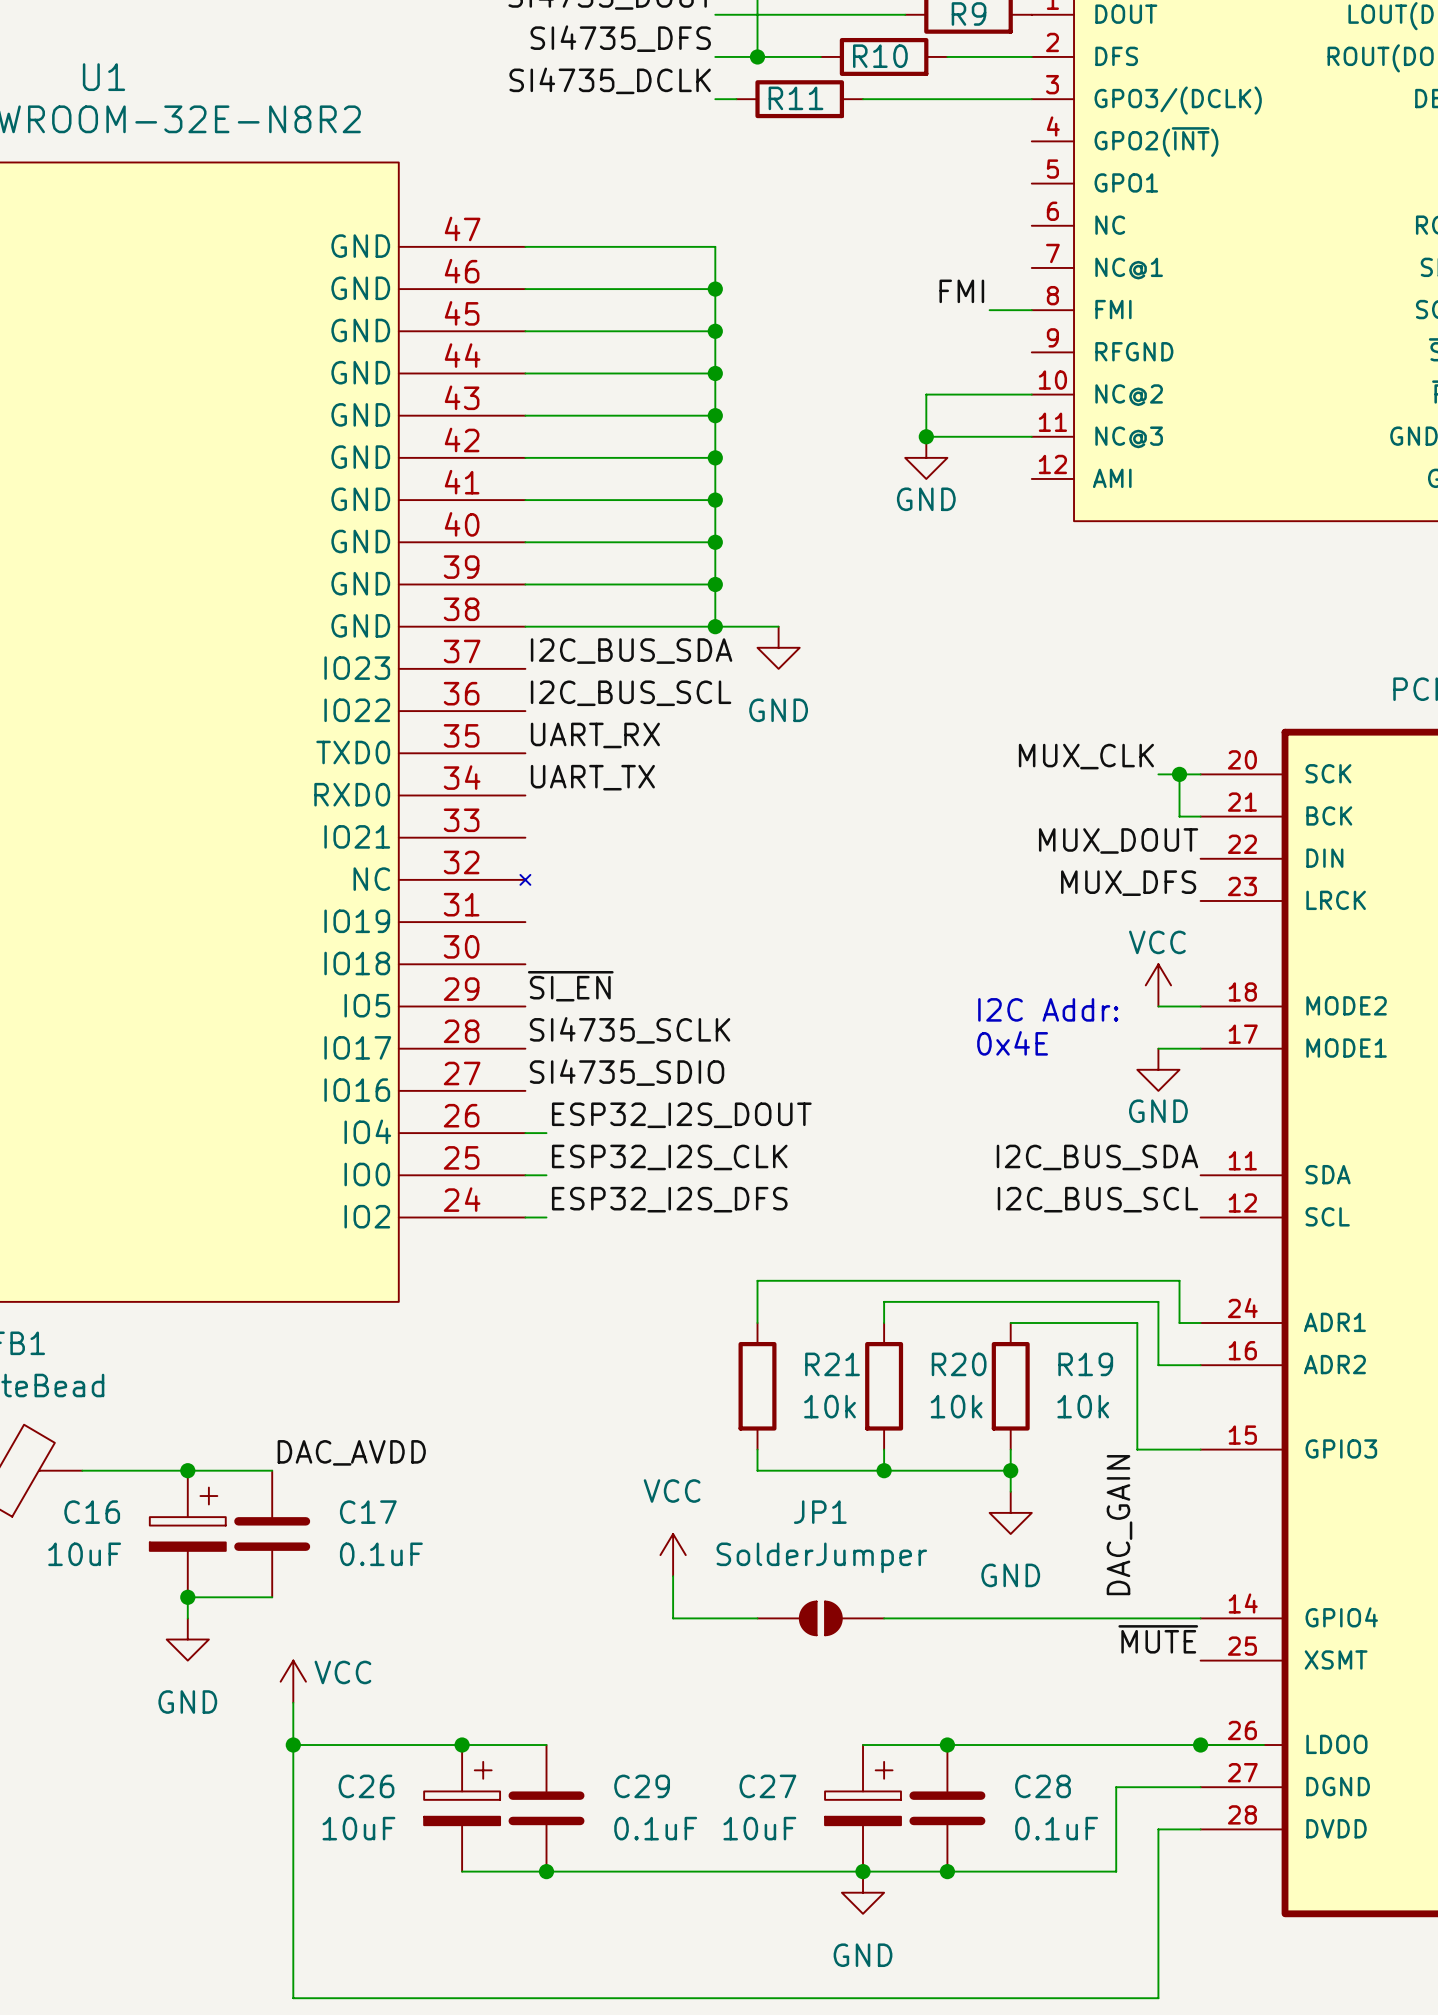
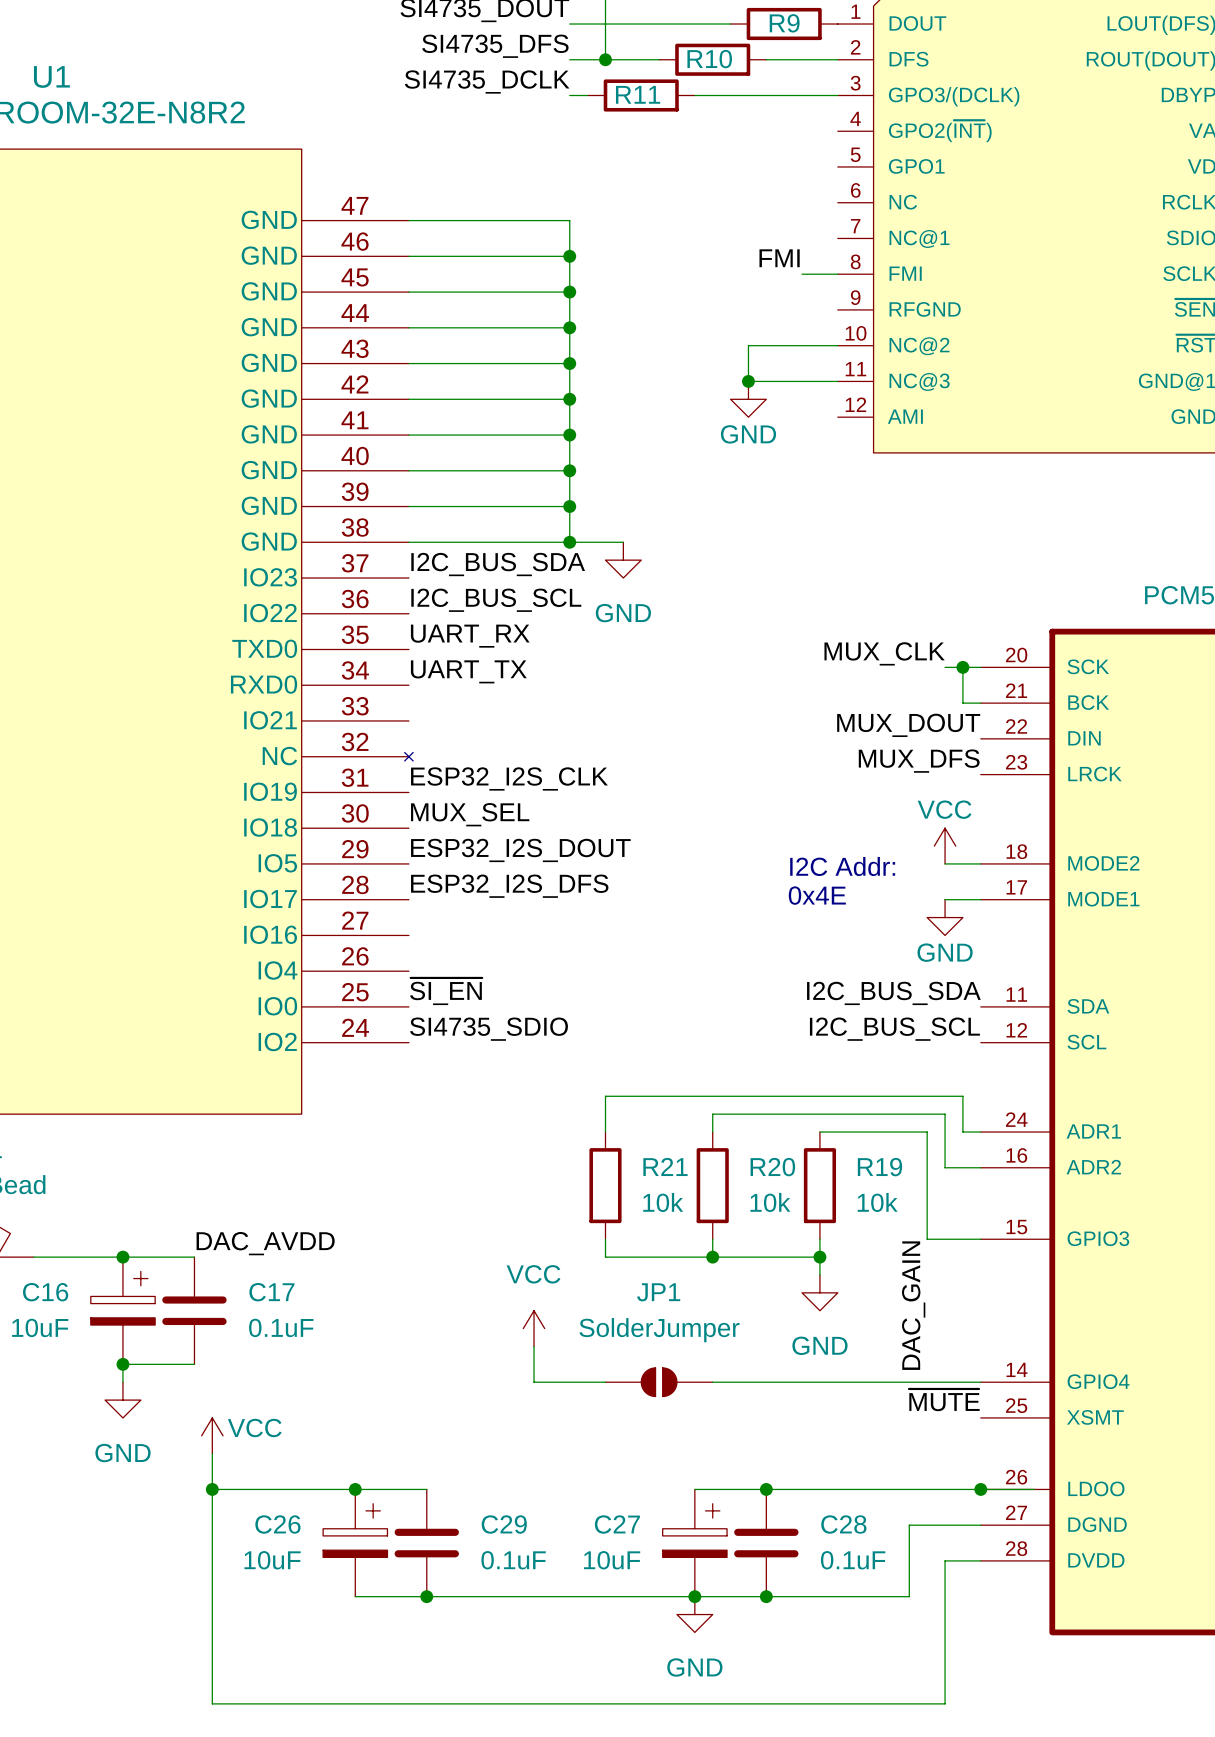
label: none -> MUX_SEL (470, 814)
label: ~{SI_EN} (570, 986) -> ESP32_I2S_DOUT (520, 850)
label: SI4735_SCLK (630, 1030) -> ESP32_I2S_DFS (509, 886)
label position: SI4735_SDIO (627, 1072) -> SI4735_SDIO (489, 1029)
label: ESP32_I2S_DOUT (681, 1115) -> none
wire: (525, 1133) (546, 1133) -> none
label: none -> ~{SI_EN} (446, 991)
label position: ESP32_I2S_CLK (669, 1157) -> ESP32_I2S_CLK (509, 778)
wire: (525, 1175) (546, 1175) -> none
label: ESP32_I2S_DFS (669, 1199) -> none
wire: (525, 1217) (546, 1217) -> none

